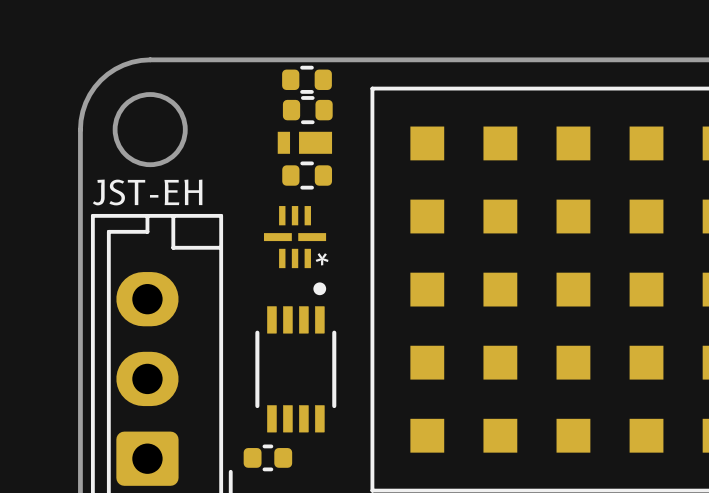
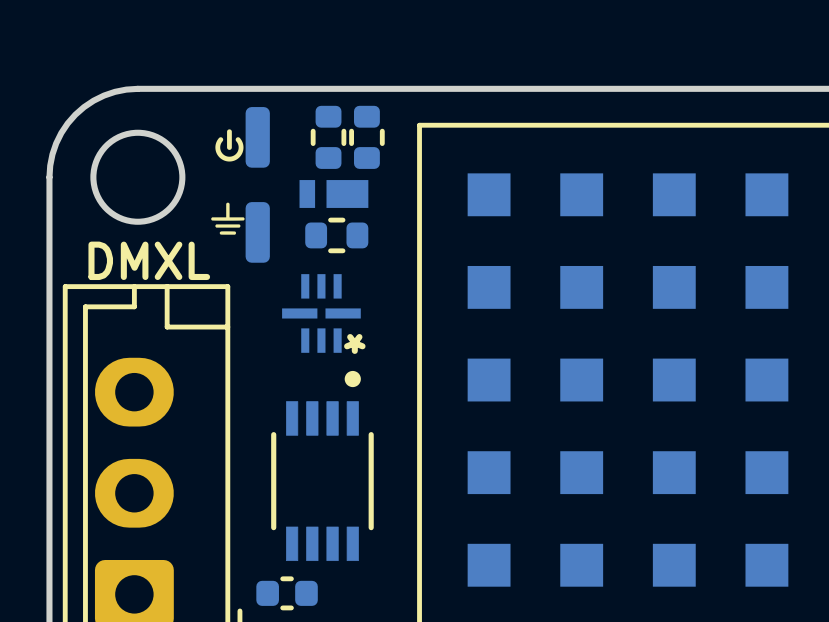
part: (307, 79) -> none
drawing: none -> [211, 129, 245, 235]
part: none -> (257, 137)
part: none -> (328, 137)
part: none -> (366, 137)
part: (307, 110) -> none
part: none -> (257, 232)
text: JST-EH (147, 192) -> DMXL (149, 260)

